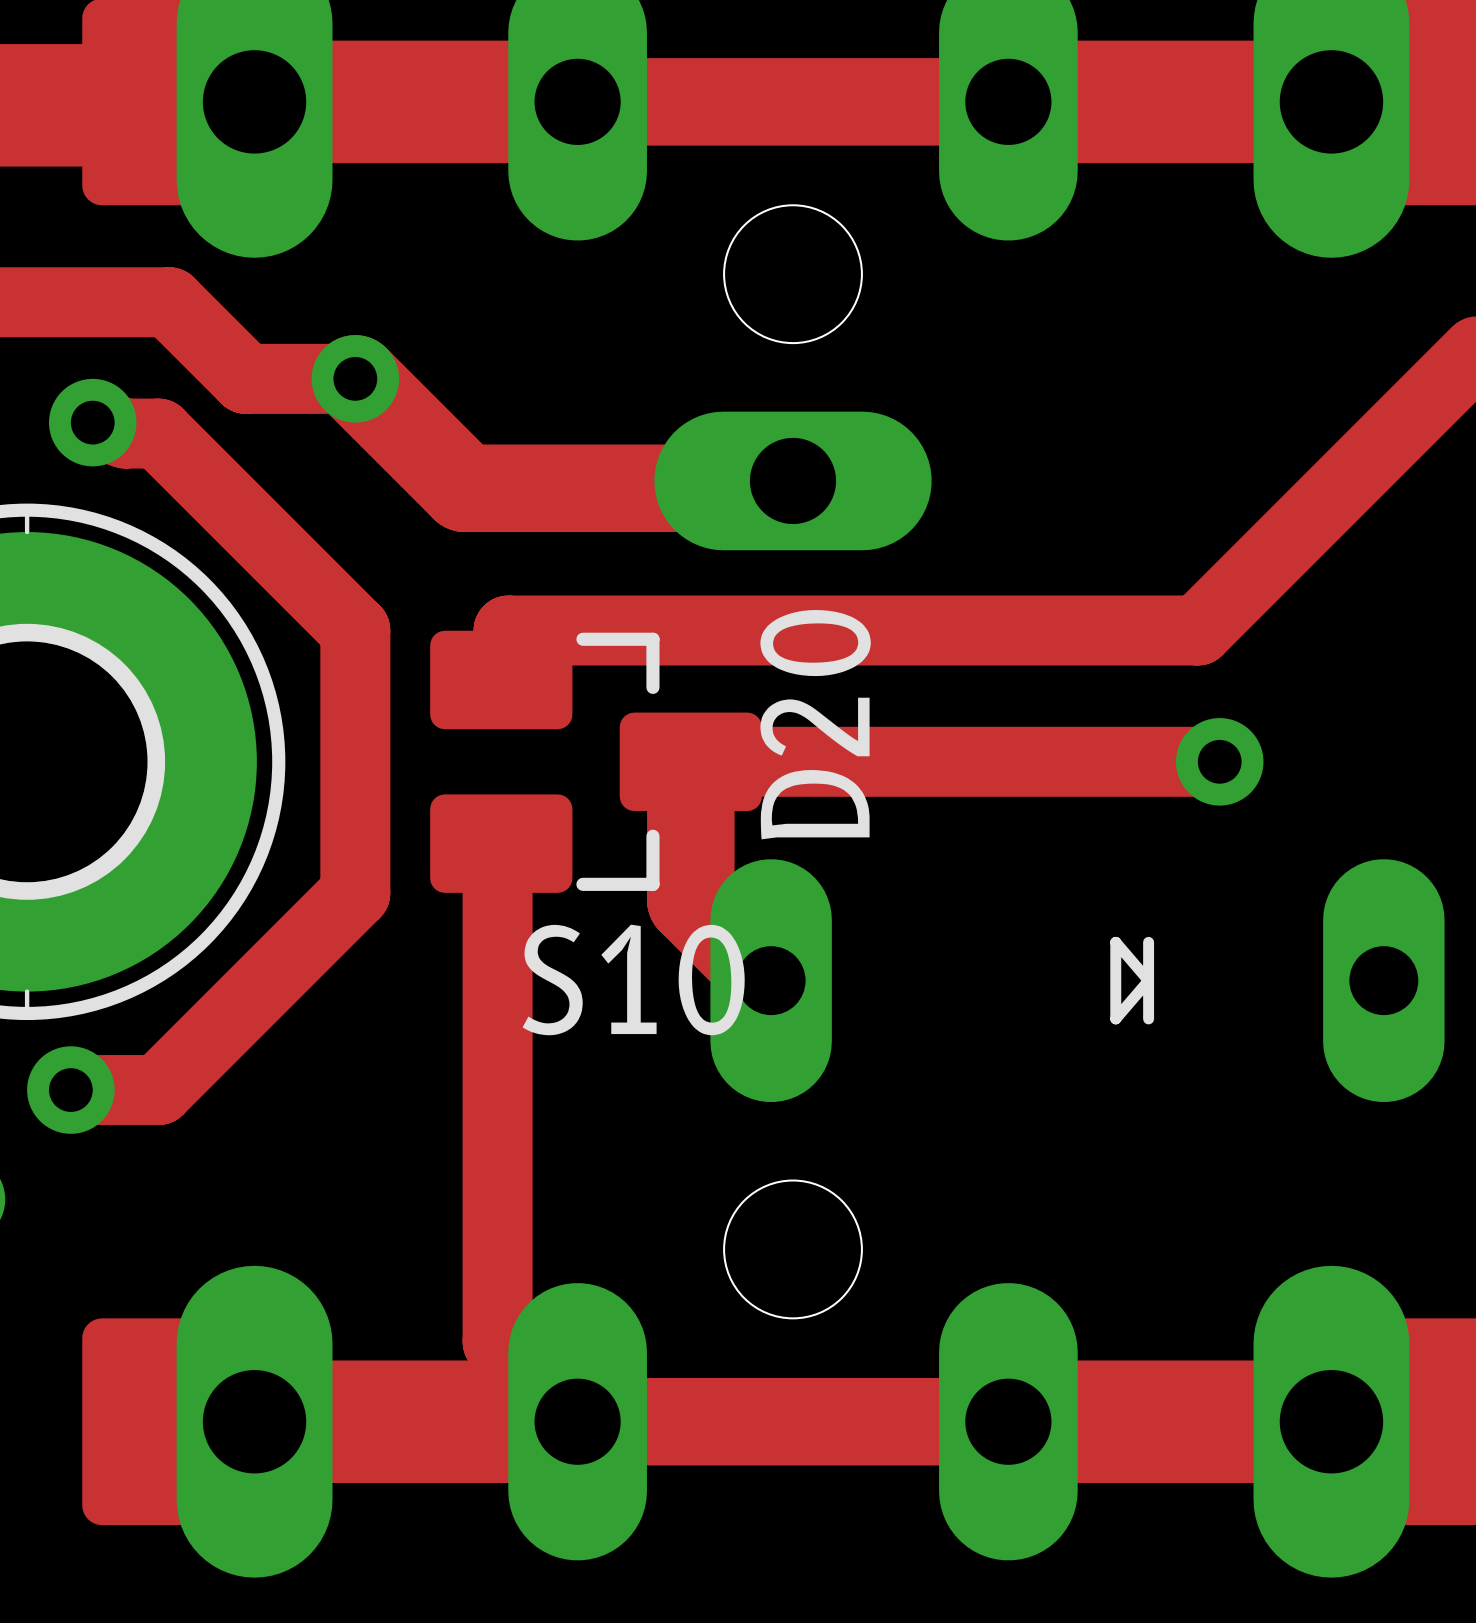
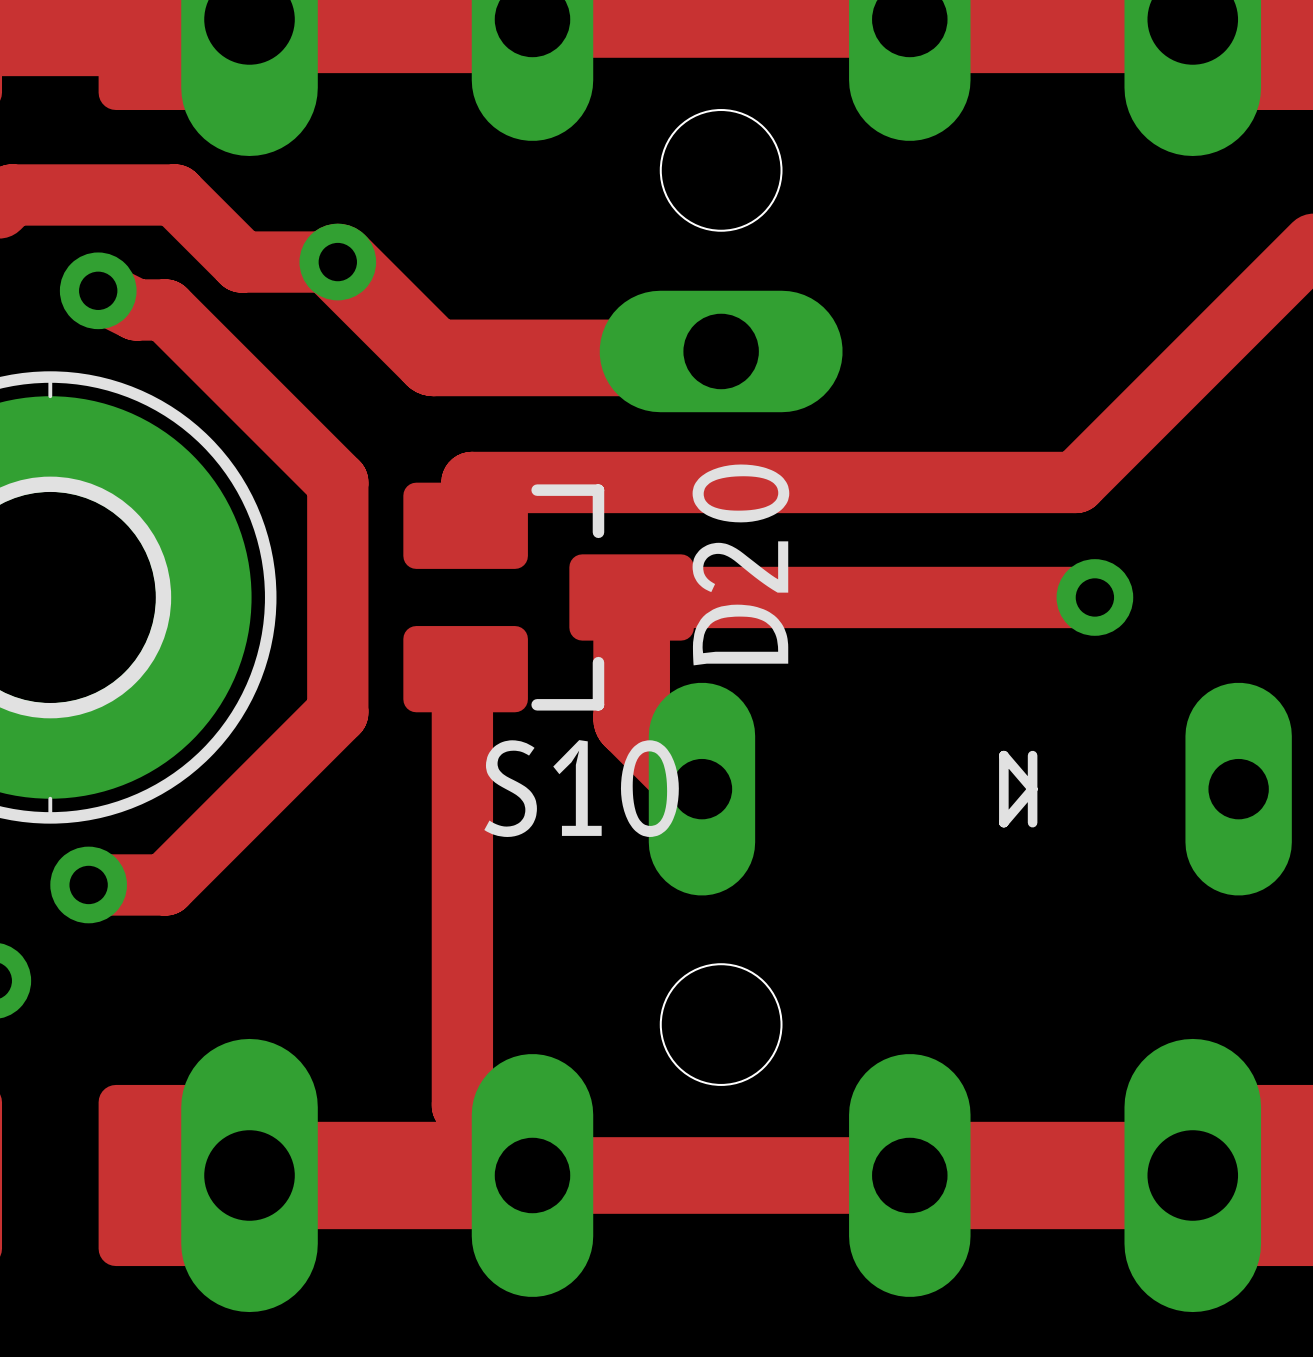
via position: (92, 422) -> (98, 290)

